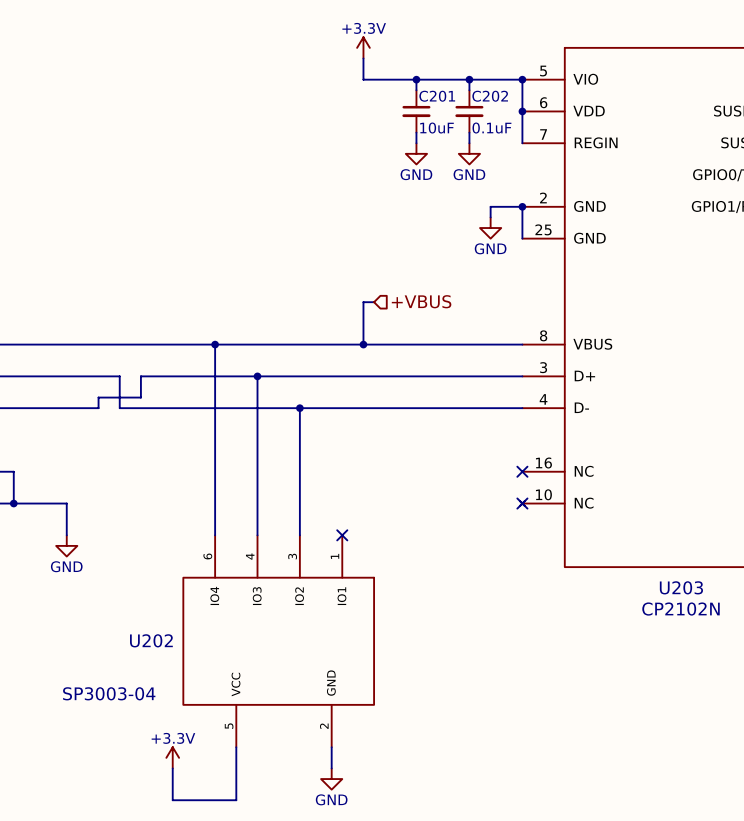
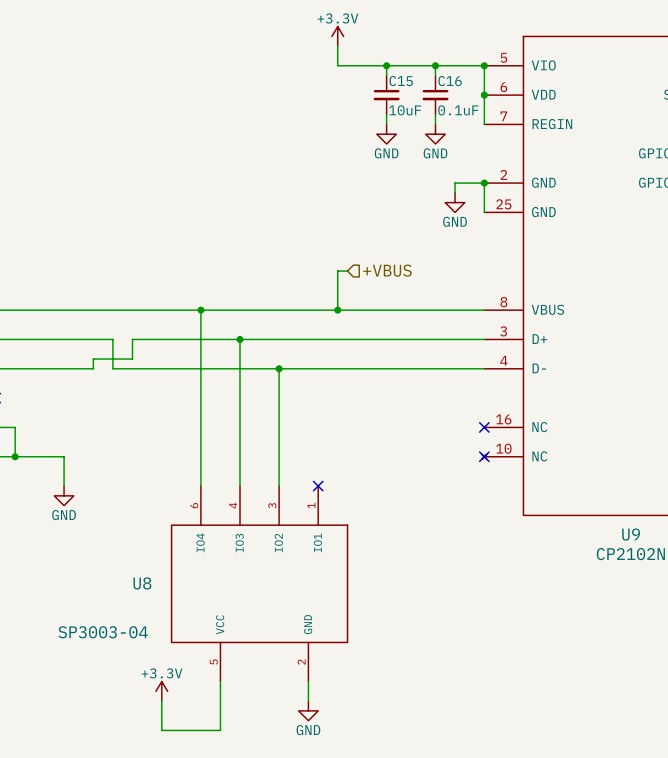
C201 name: C201 (437, 96) -> C15 (401, 81)
C202 name: C202 (490, 96) -> C16 (450, 81)
U203 name: U203 (681, 587) -> U9 (631, 534)
U202 name: U202 (151, 640) -> U8 (142, 583)

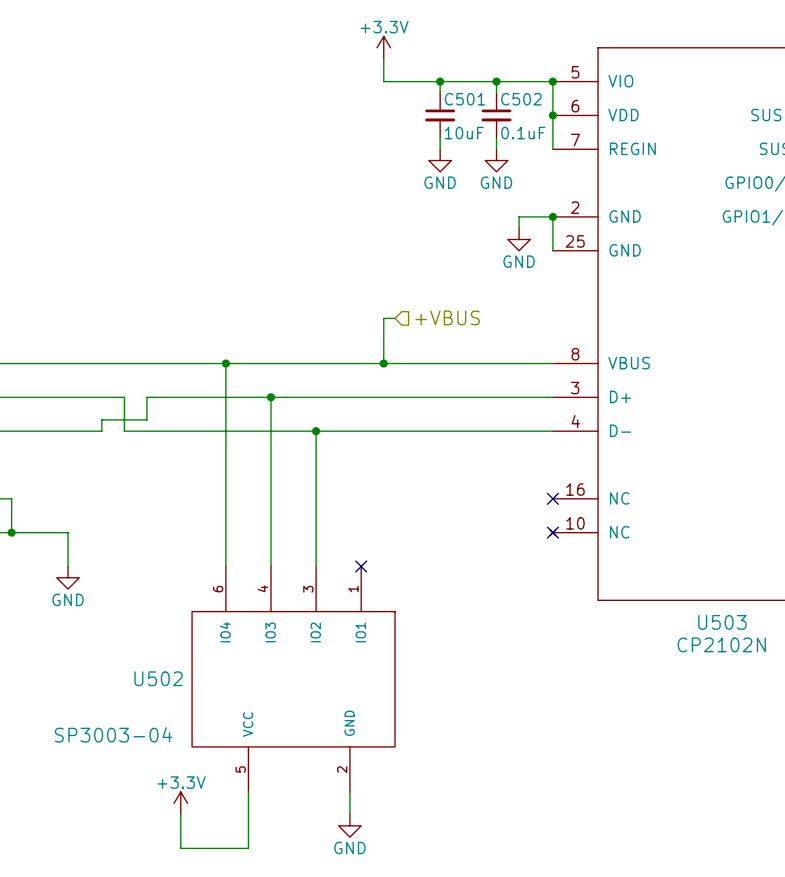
C15 name: C15 (401, 81) -> C501 (465, 99)
C16 name: C16 (450, 81) -> C502 (521, 99)
U9 name: U9 (631, 534) -> U503 (722, 622)
U8 name: U8 (142, 583) -> U502 (158, 678)

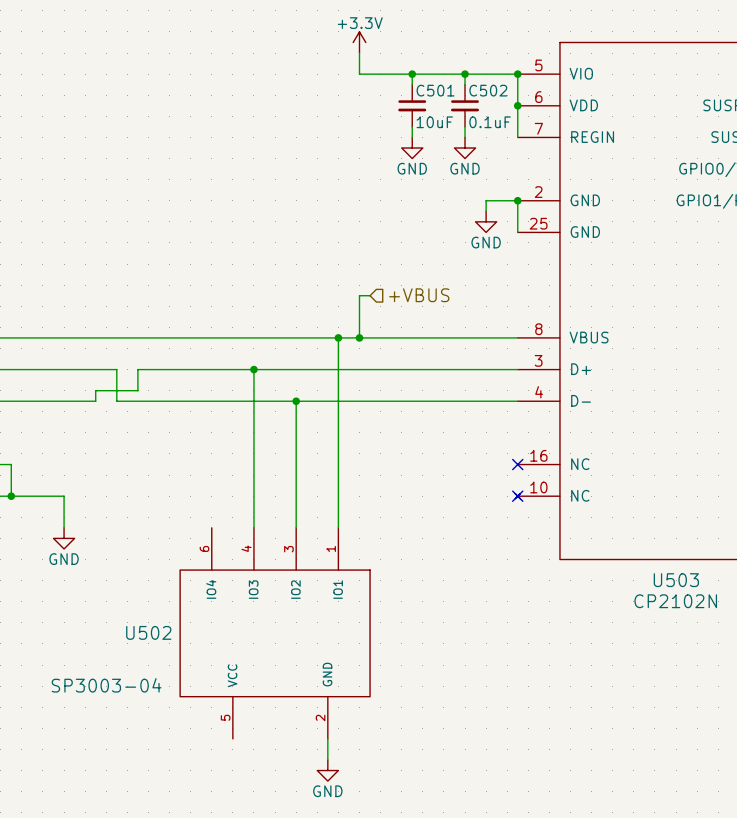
wire: (225, 363) (225, 566) -> (338, 337) (338, 527)
junction: (225, 363) -> none
junction: none -> (338, 337)
no-connect mark: (361, 566) -> none
wire: (248, 792) (248, 848) (180, 848) (180, 814) -> none
power symbol: +3.3V (180, 803) -> none

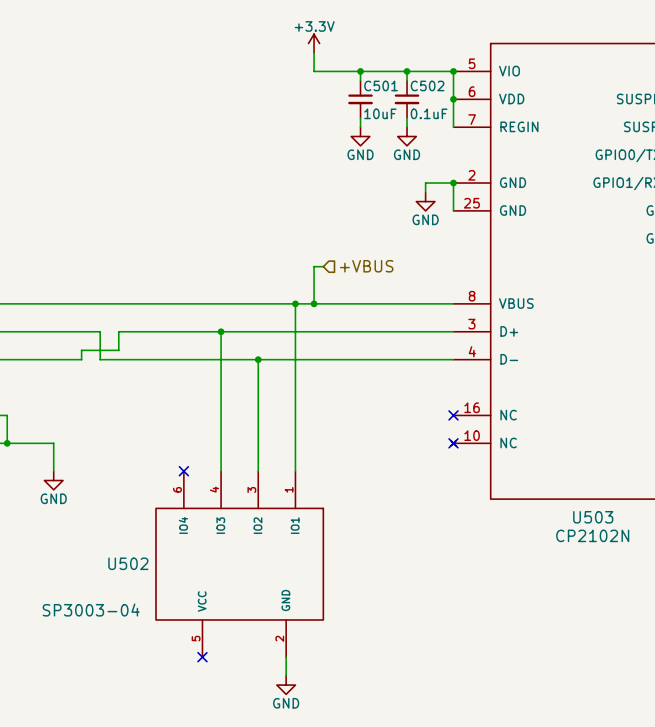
no-connect mark: none -> (183, 471)
no-connect mark: none -> (202, 657)

